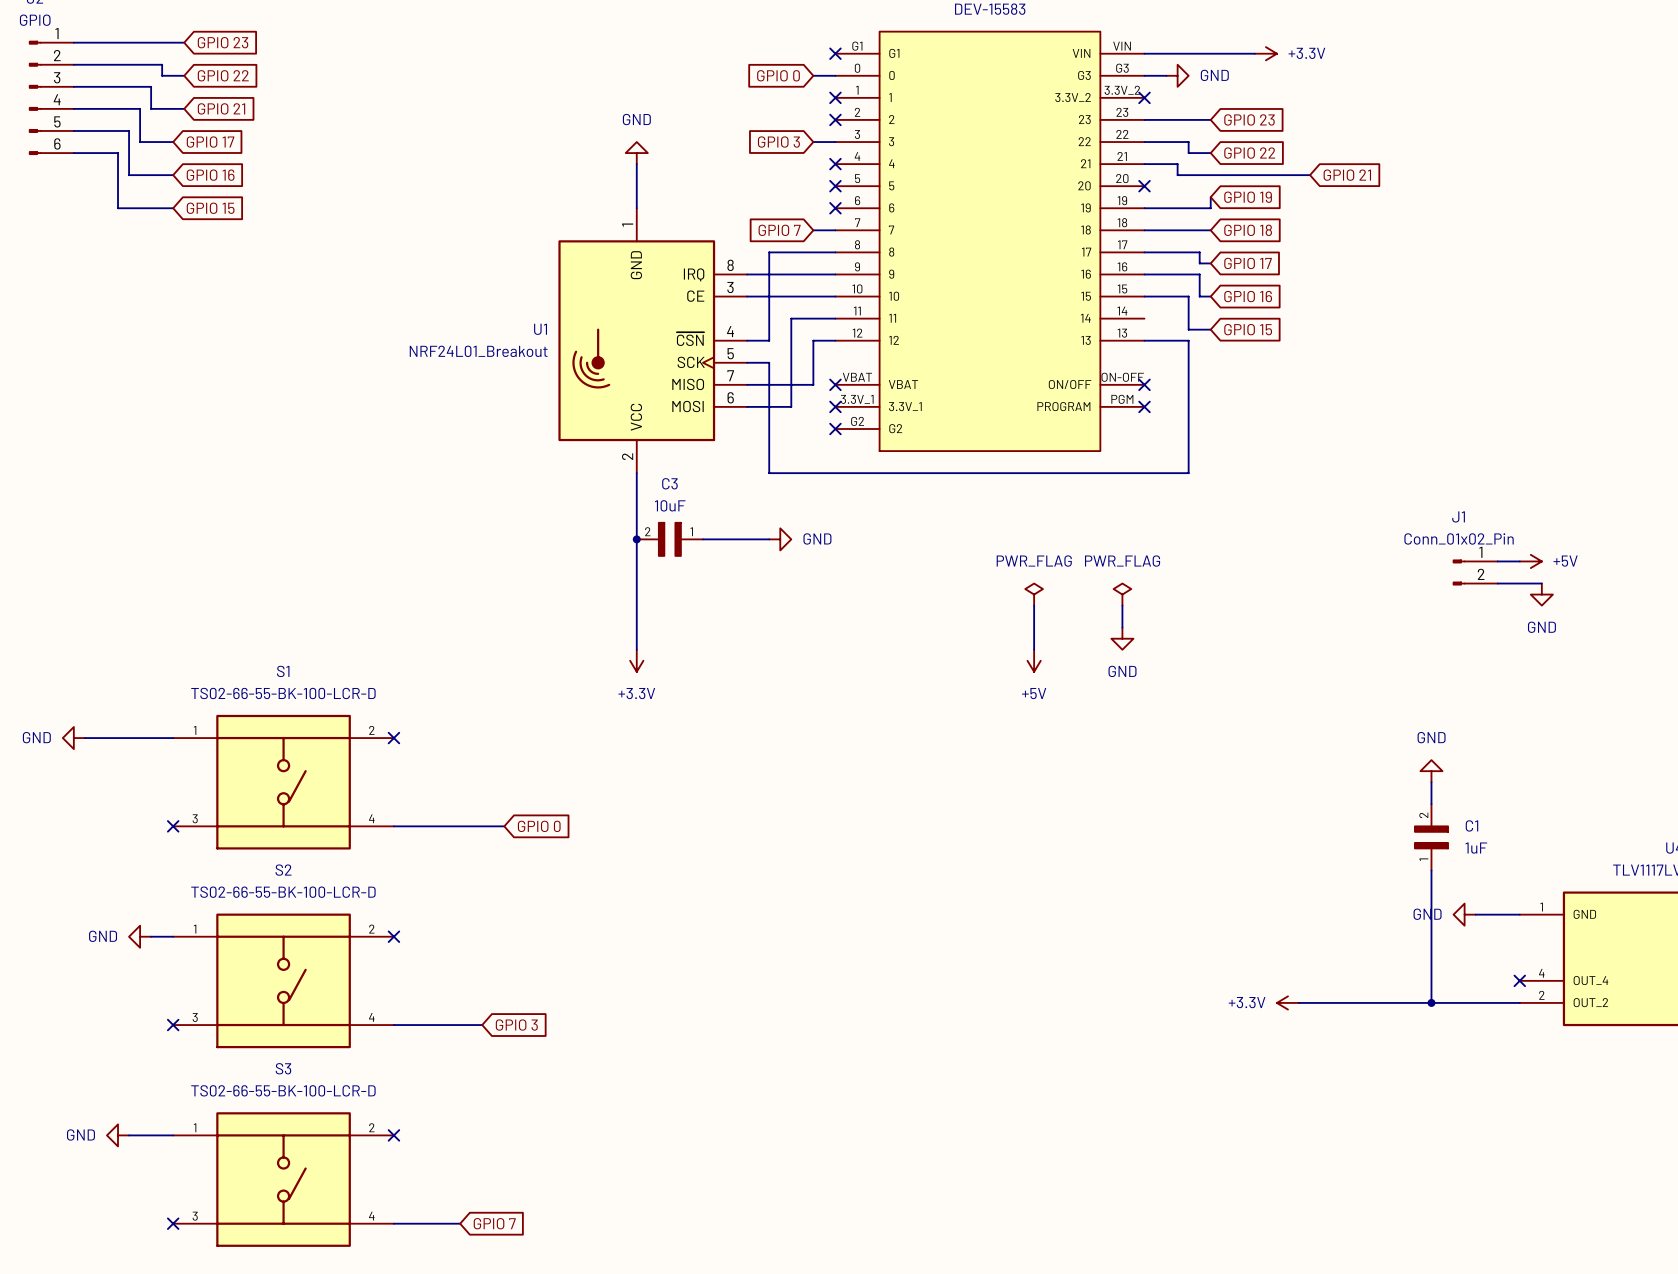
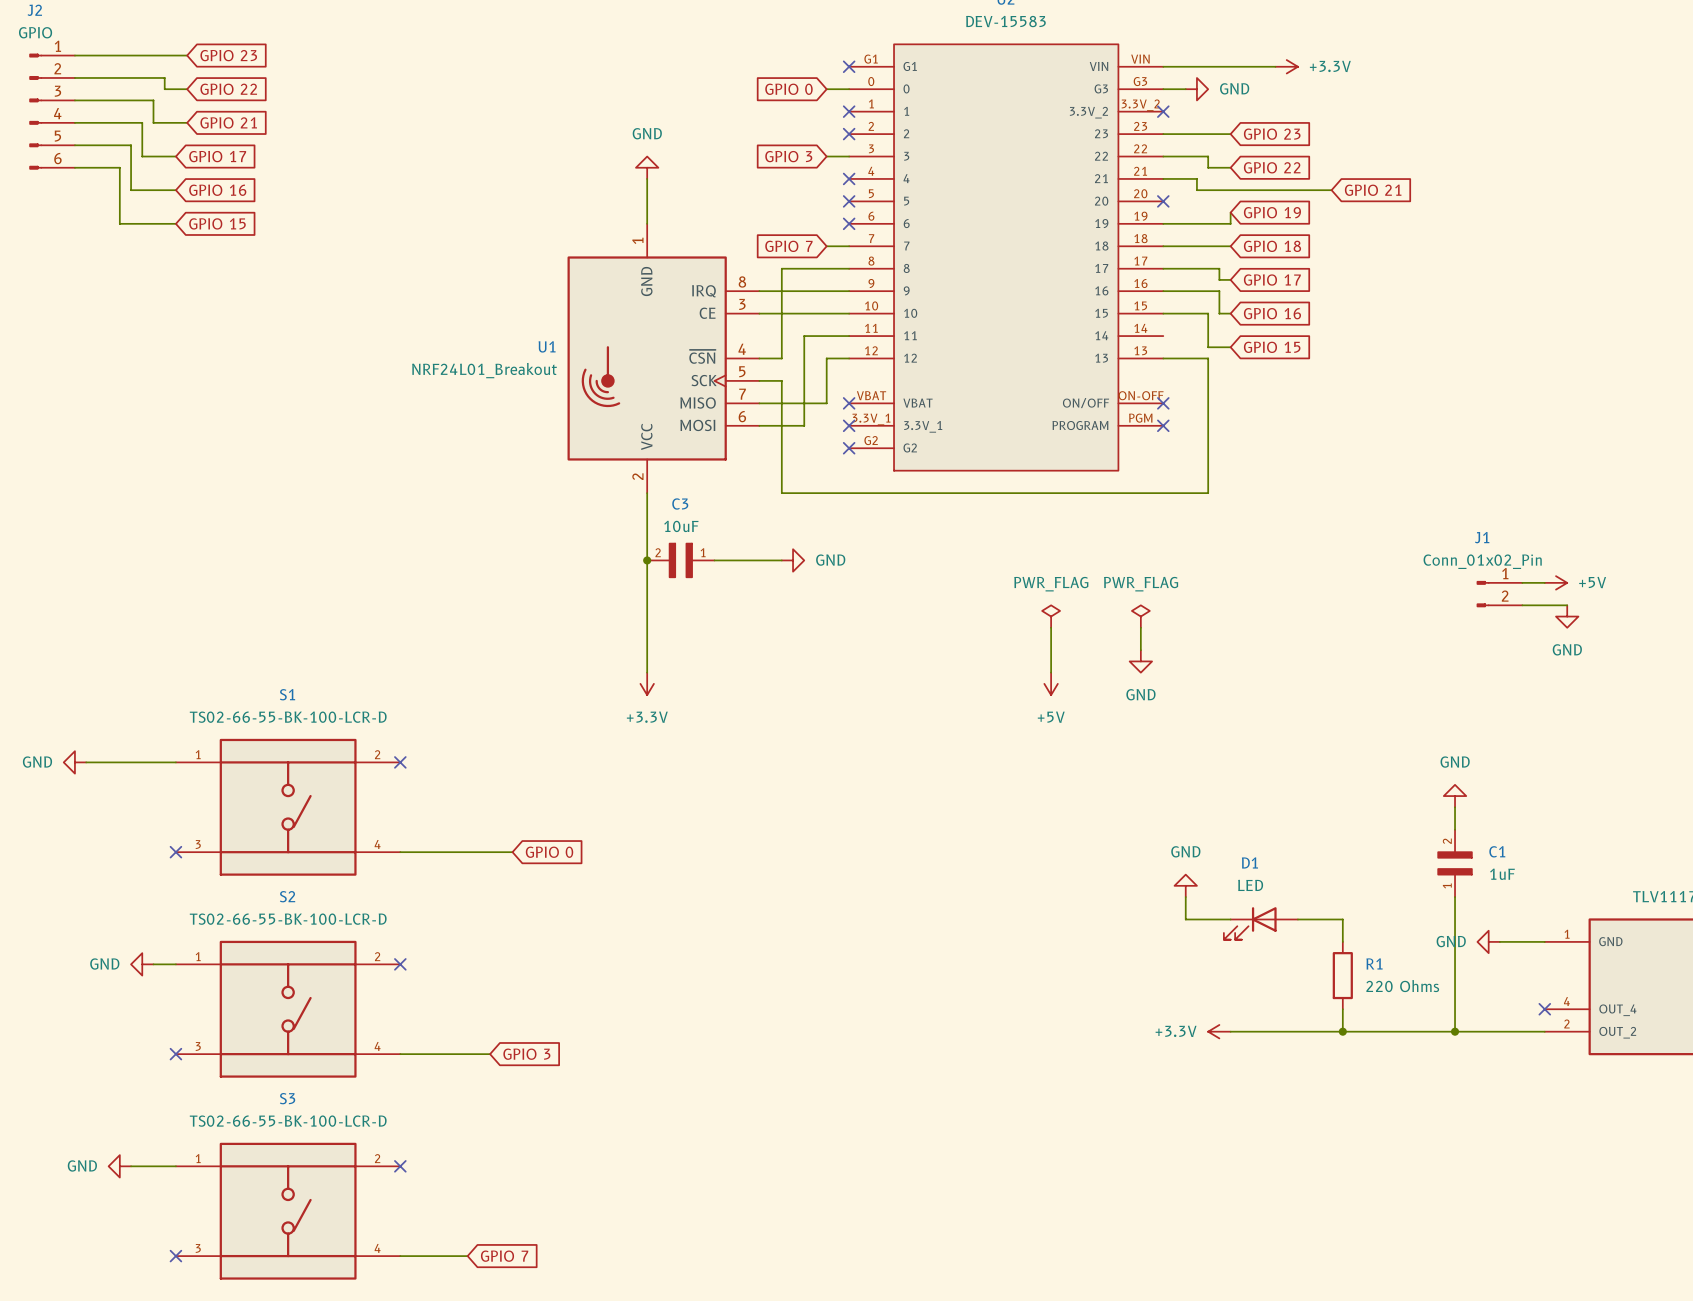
power symbol: none -> GND (1185, 885)
wire: none -> (1185, 897) (1185, 919) (1230, 919)
wire: none -> (1297, 919) (1342, 919) (1342, 941)
D1: none -> LED (1260, 923)
R1: none -> 220 Ohms (1342, 975)
wire: none -> (1342, 1009) (1342, 1031)
wire: none -> (1230, 1031) (1320, 1031)
power symbol position: +3.3V (1287, 1002) -> +3.3V (1219, 1031)
junction: none -> (1342, 1031)

